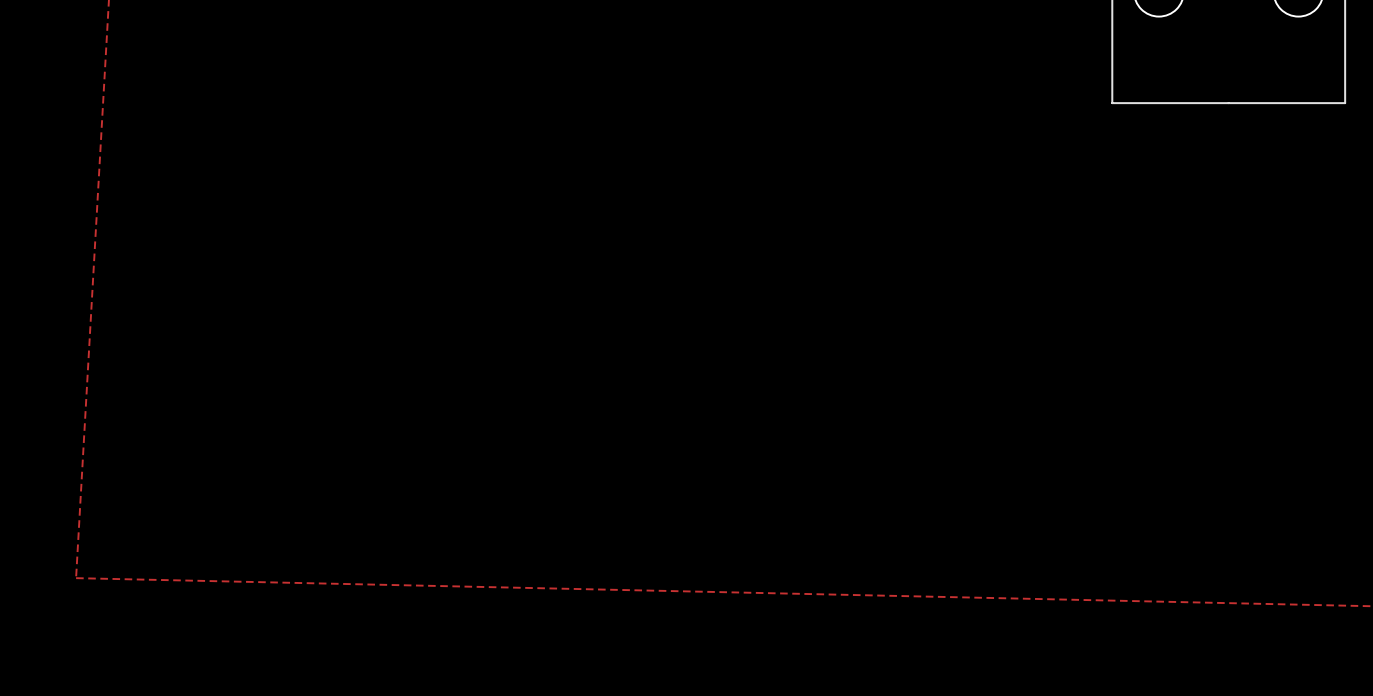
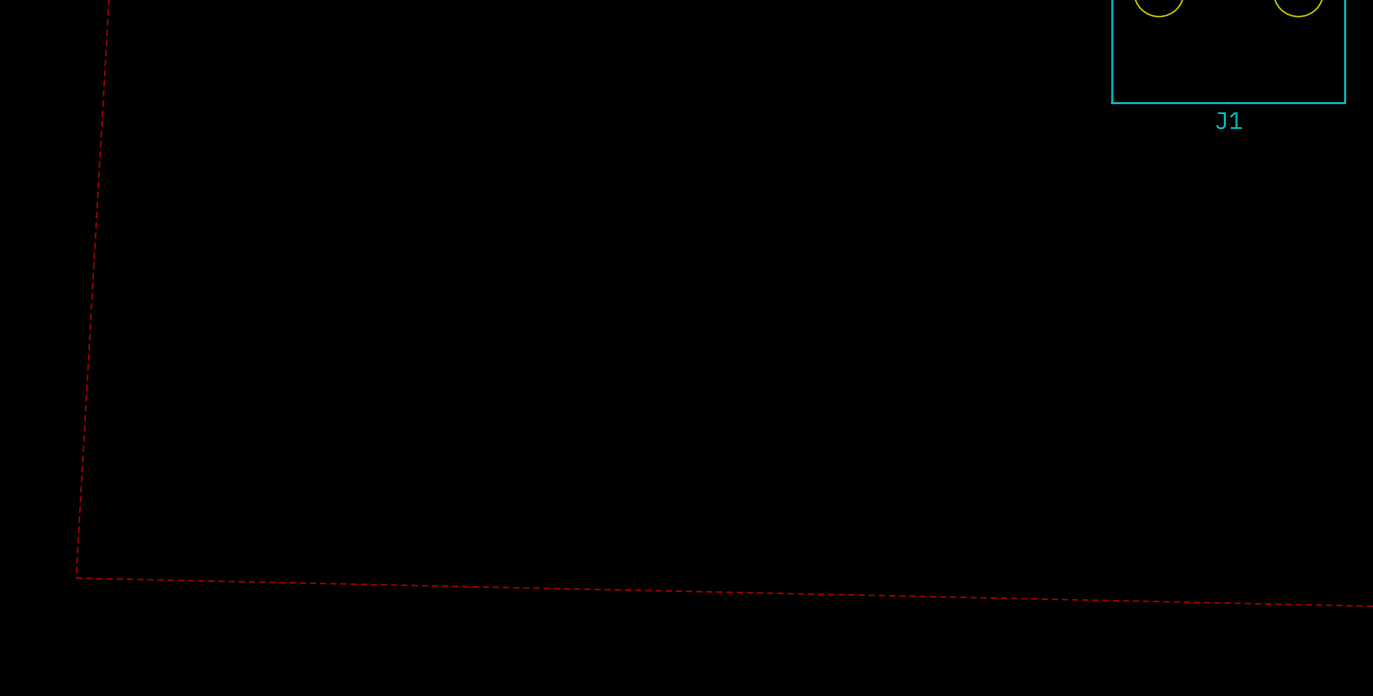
J1 name: none -> J1 (1229, 120)

